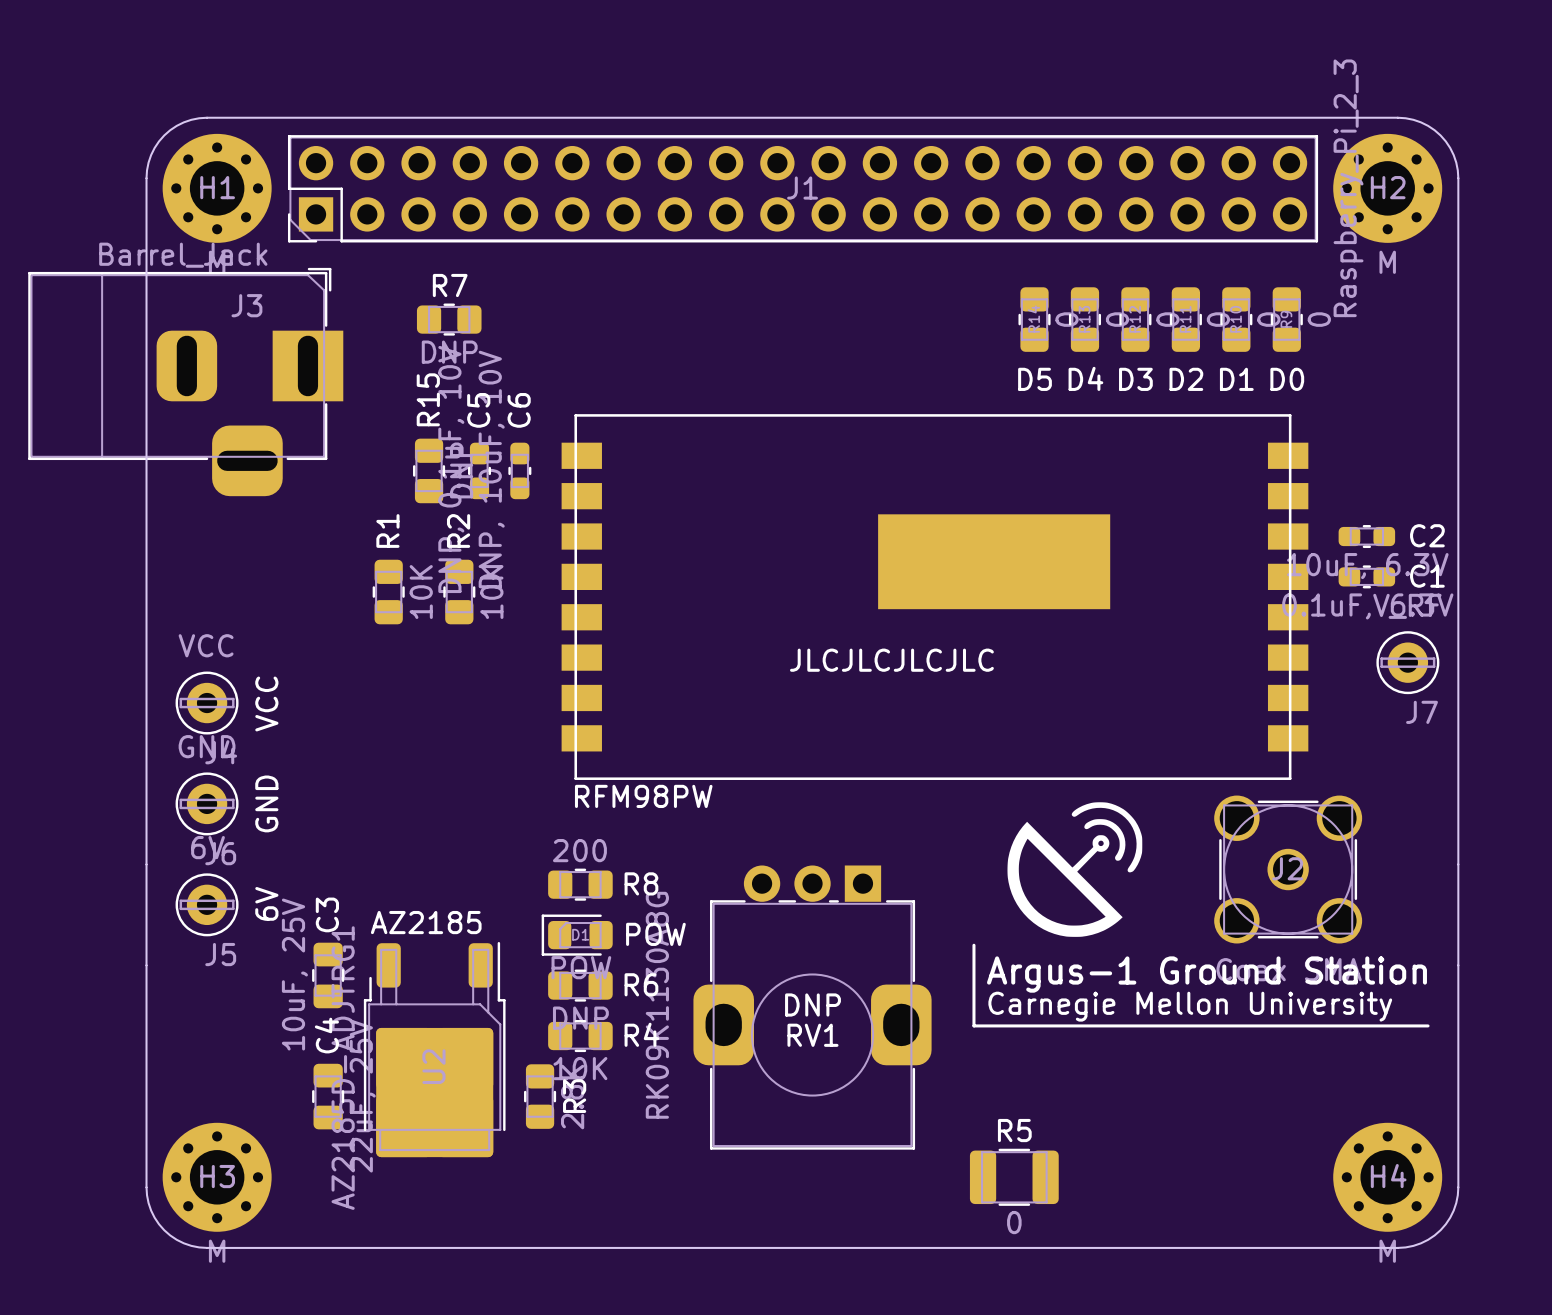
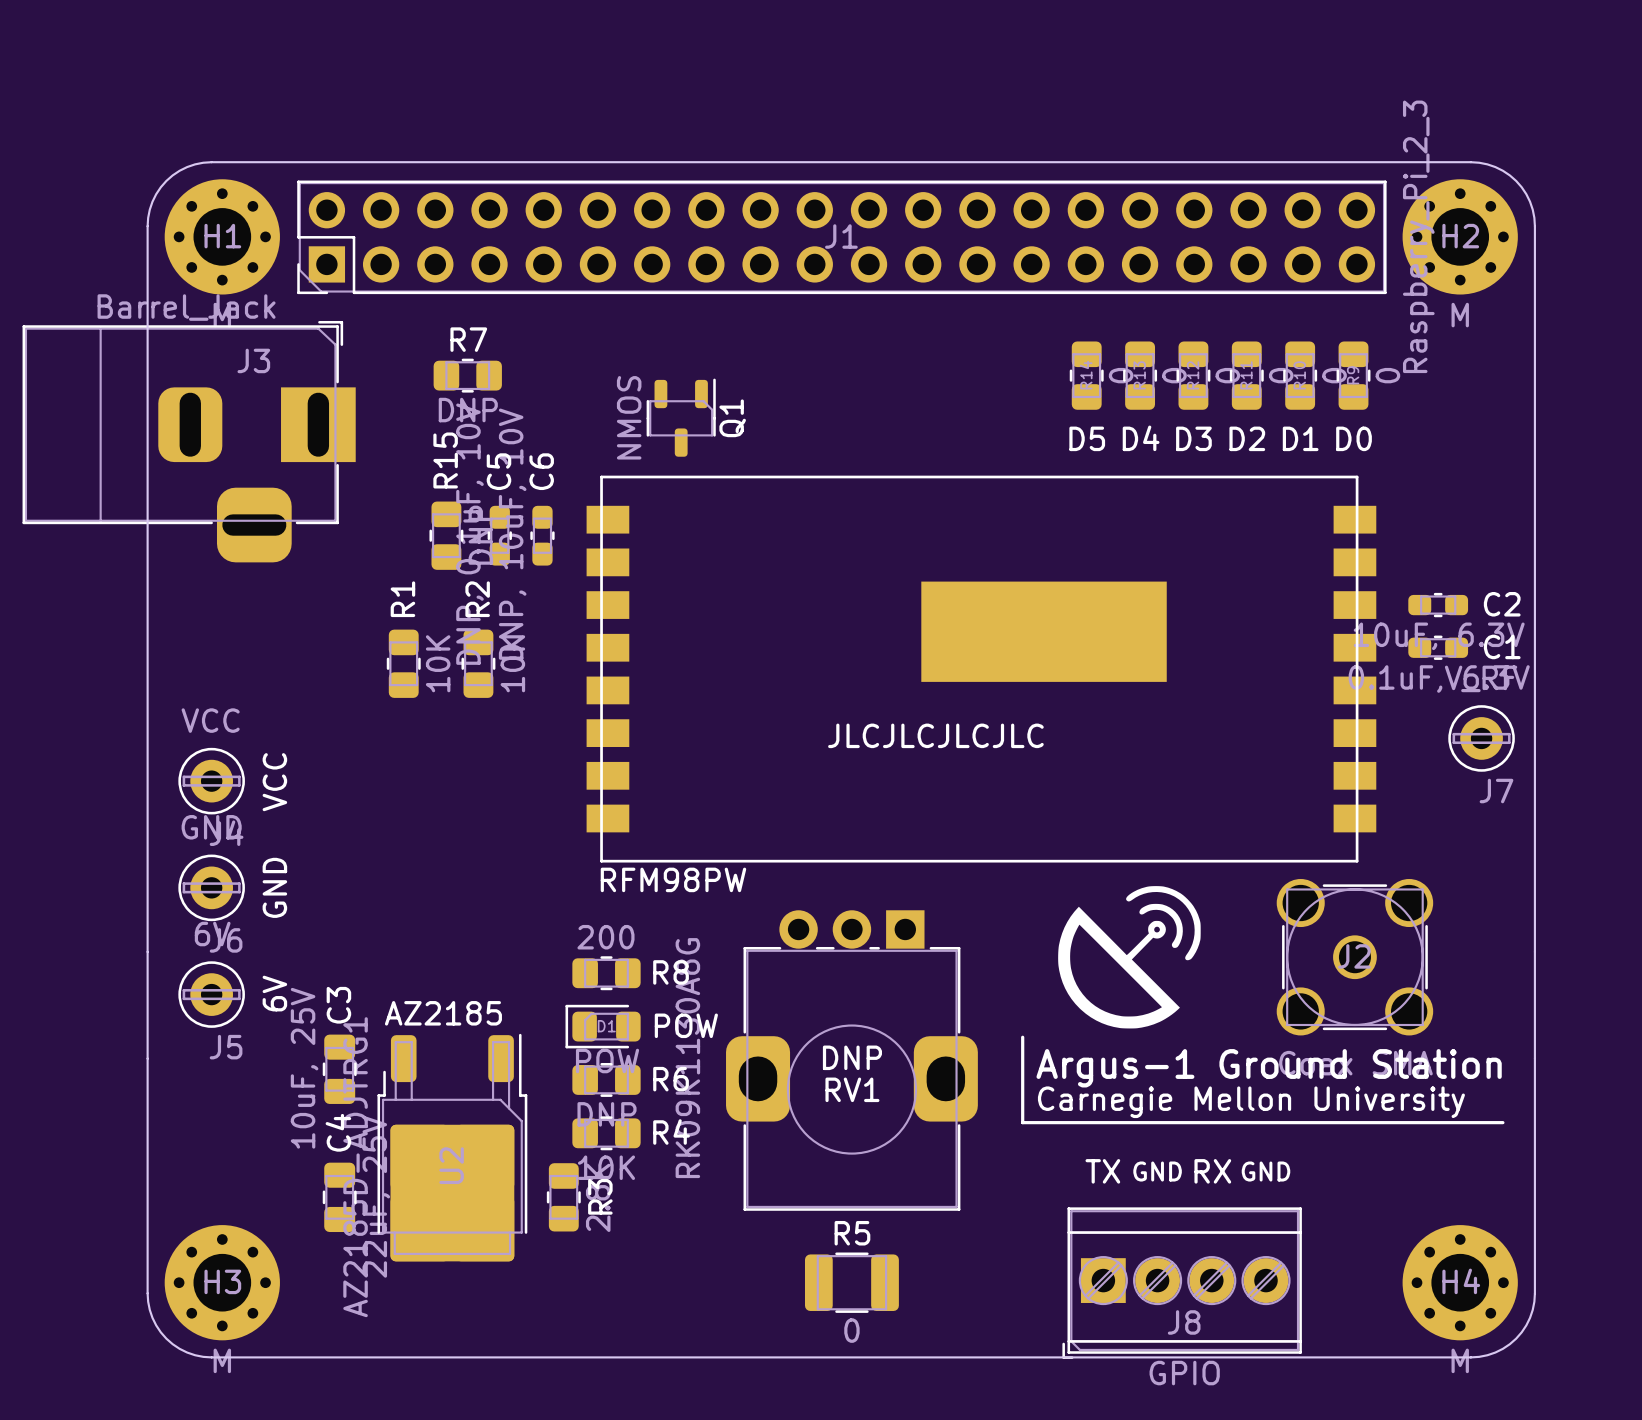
Q1: none -> NMOS (681, 417)
text position: DNP (812, 1005) -> DNP (852, 1057)
RV1 position: (812, 1007) -> (851, 1060)
text: none -> TX (1102, 1171)
text: none -> GND (1157, 1171)
text: none -> RX (1212, 1171)
text: none -> GND (1266, 1171)
R5 position: (1014, 1177) -> (851, 1282)
J8: none -> GPIO (1182, 1283)

